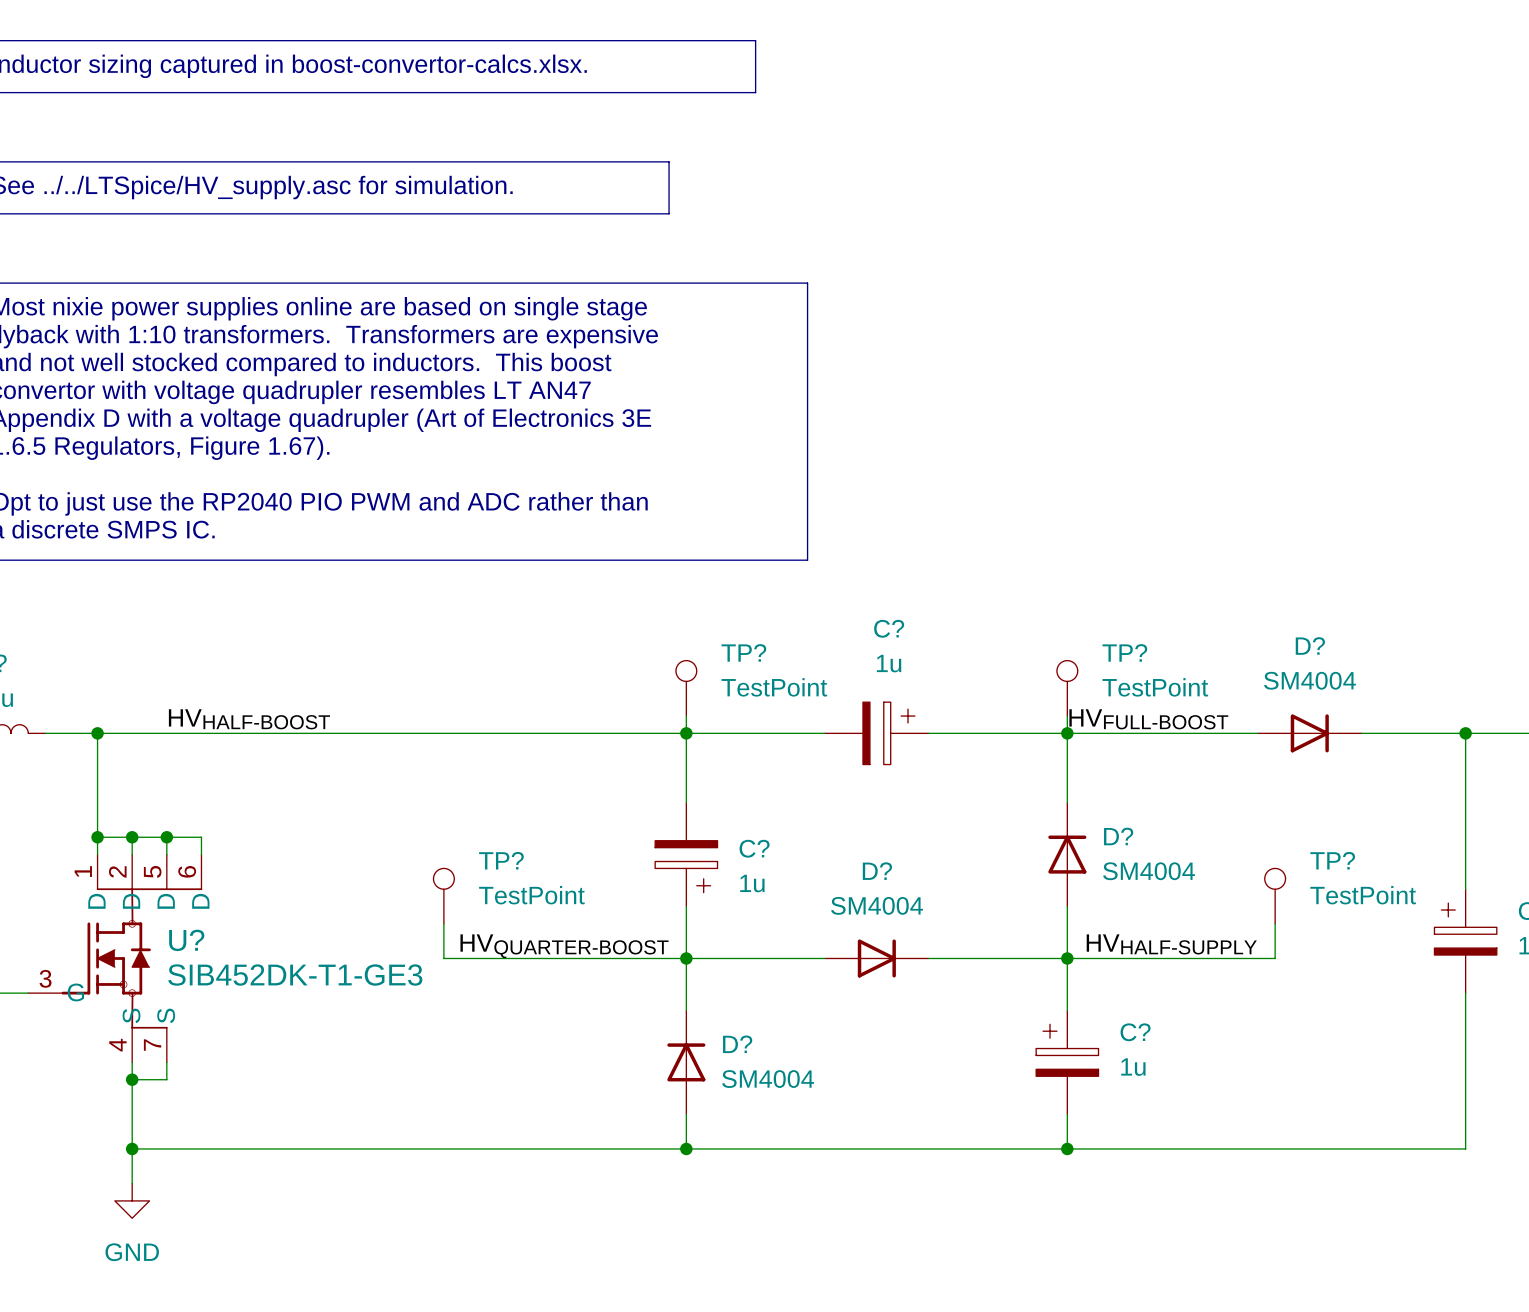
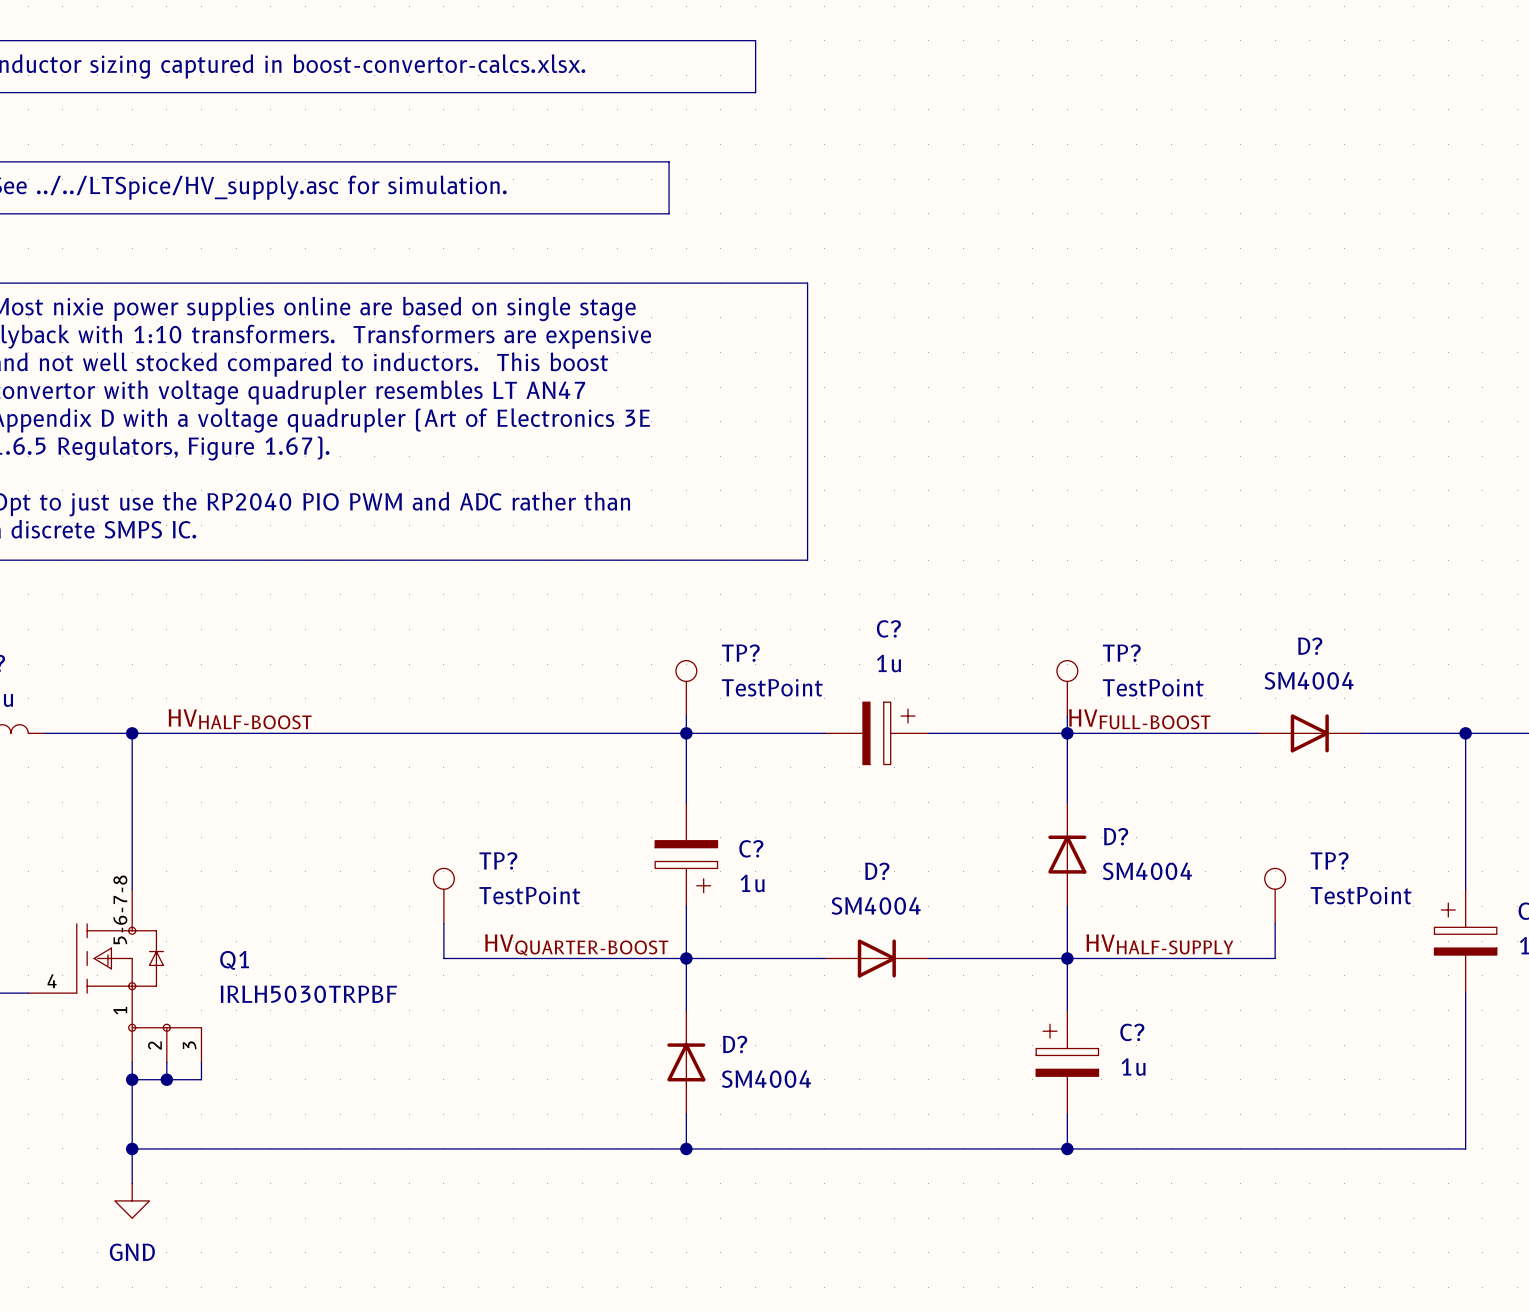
wire: (97, 733) (97, 854) -> none
junction position: (97, 733) -> (132, 733)
wire: none -> (132, 733) (132, 837)
wire: (97, 837) (201, 837) (201, 854) -> none
junction: (97, 837) -> none
junction: (132, 837) -> none
wire: (166, 837) (166, 854) -> none
junction: (166, 837) -> none
U?: SIB452DK-T1-GE3 (115, 958) -> none
Q1: none -> IRLH5030TRPBF (114, 975)
wire: none -> (201, 1062) (201, 1079) (166, 1079)
junction: none -> (166, 1079)

